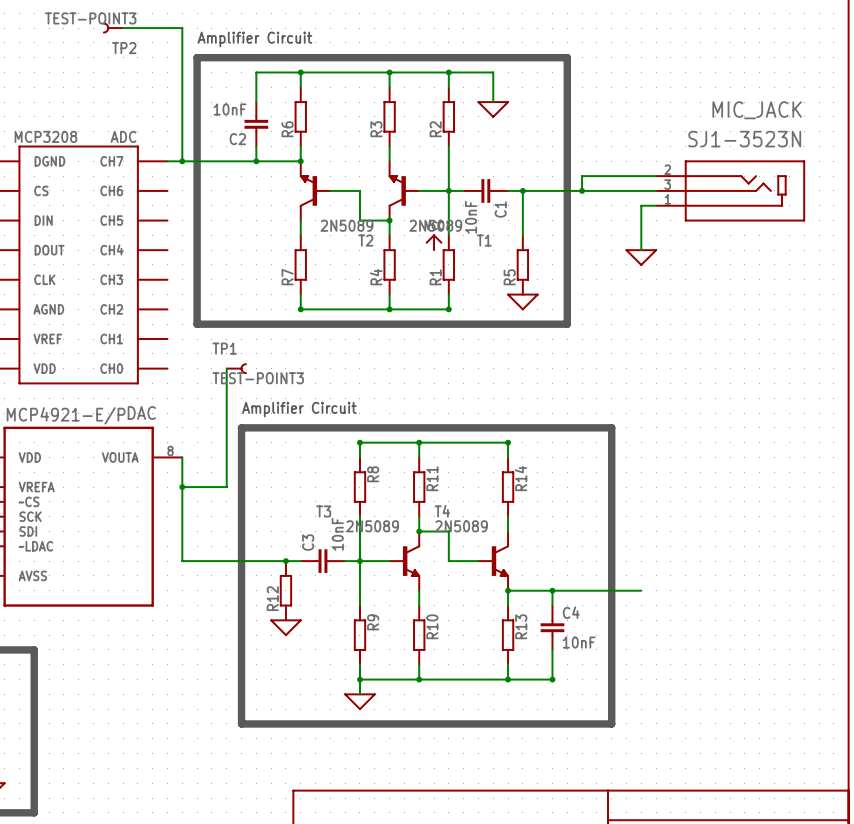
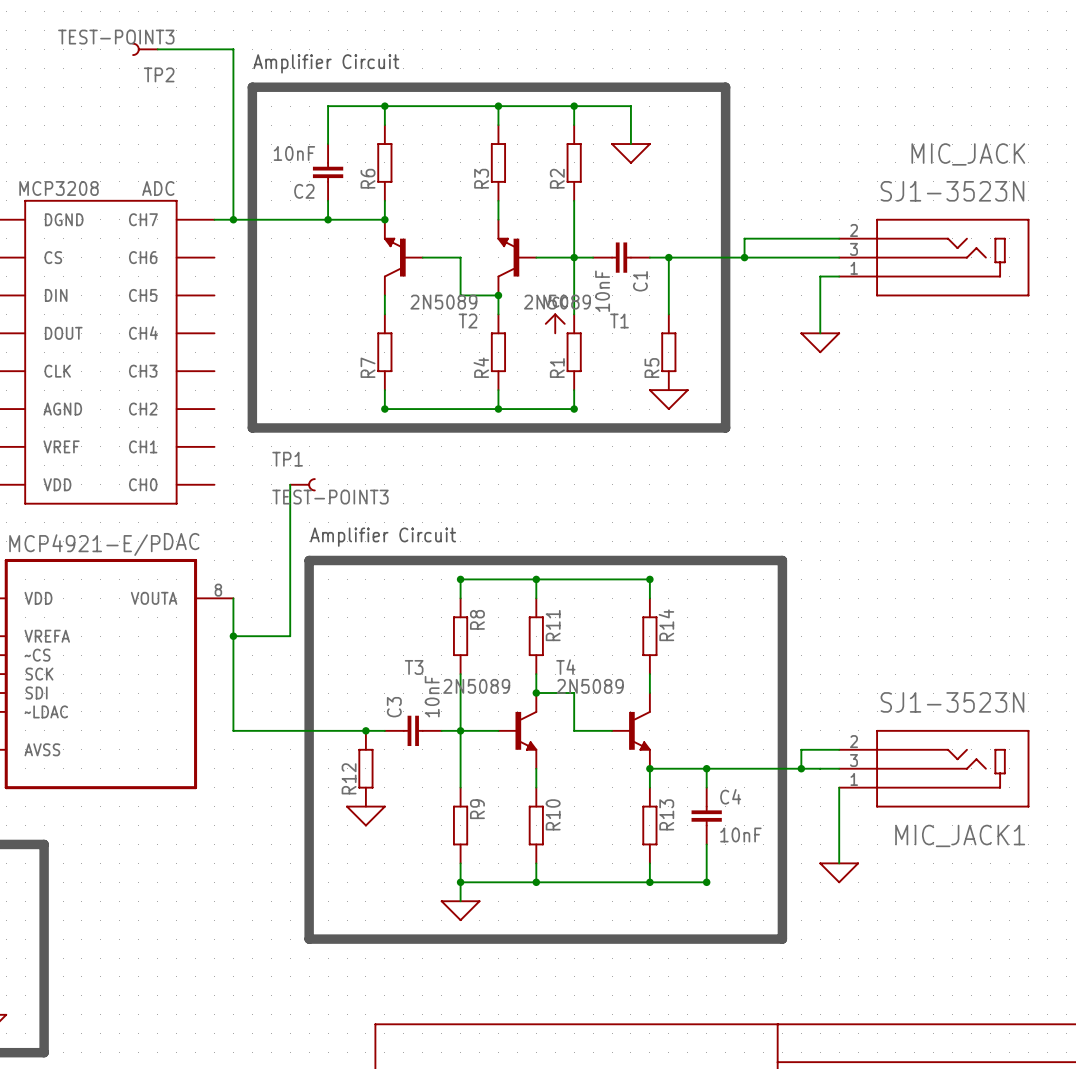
wire: none -> (839, 749) (801, 749) (801, 768)
junction: none -> (801, 768)
wire: none -> (820, 768) (839, 768)
MIC_JACK1: none -> SJ1-3523N (934, 768)
wire: none -> (839, 787) (839, 863)
power symbol: none -> (839, 872)

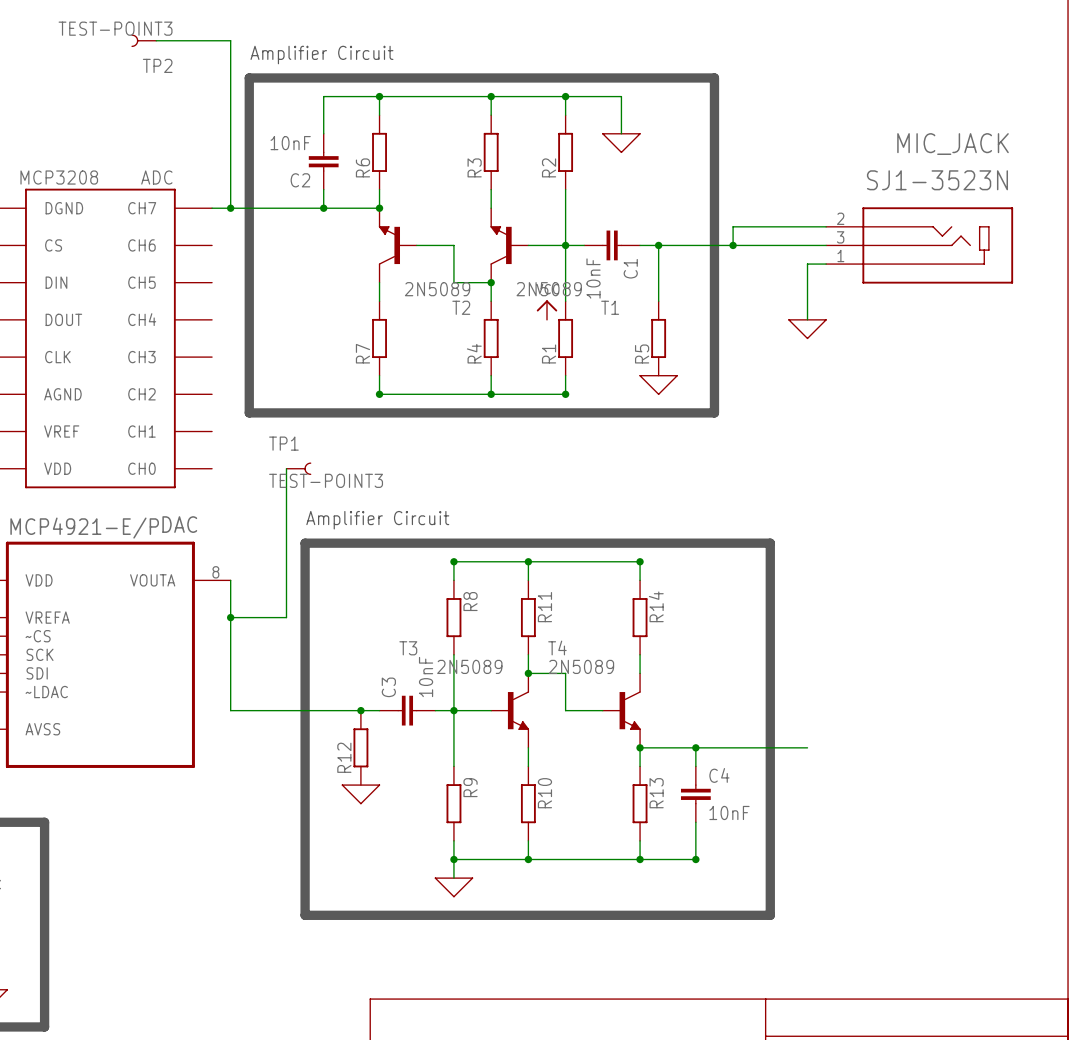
wire: (839, 749) (801, 749) (801, 768) -> none
junction: (801, 768) -> none
wire: (820, 768) (839, 768) -> none
MIC_JACK1: SJ1-3523N (934, 768) -> none
wire: (839, 787) (839, 863) -> none
power symbol: (839, 872) -> none

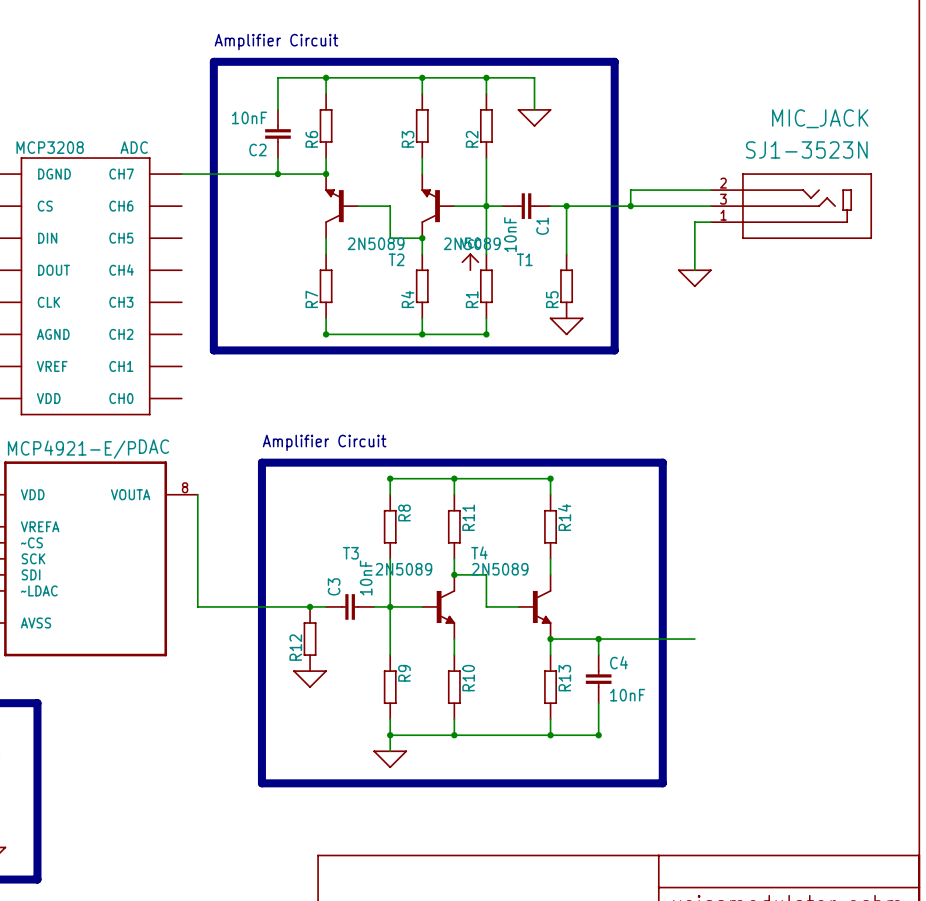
TP2: TEST-POINT3 (144, 40) -> none
wire: (156, 40) (230, 40) (230, 208) -> none
junction: (230, 208) -> none
wire: (286, 468) (286, 617) (230, 617) -> none
TP1: TEST-POINT3 (298, 468) -> none
junction: (230, 617) -> none

